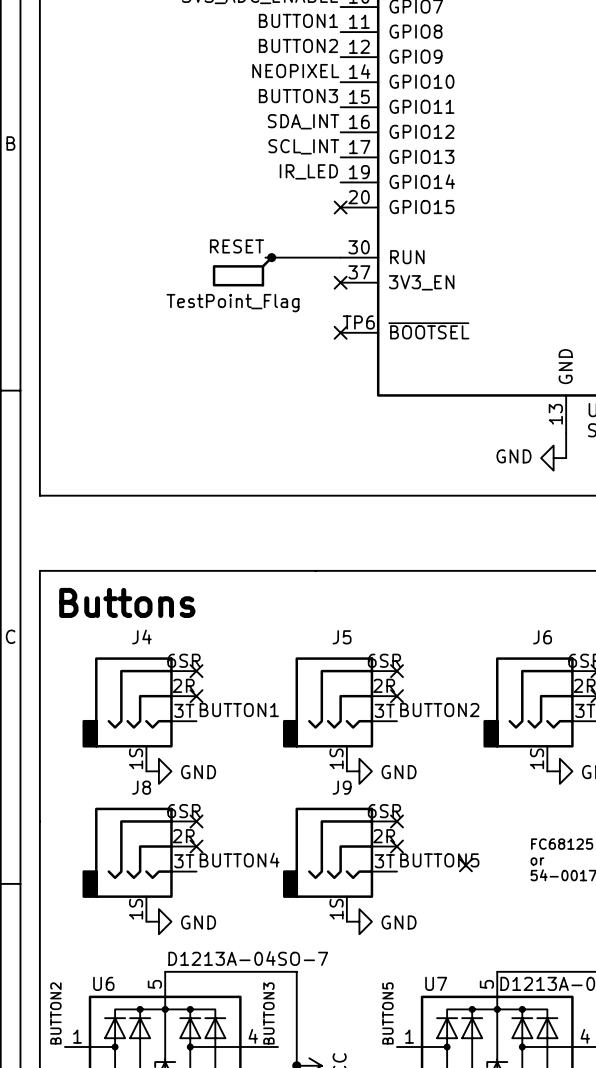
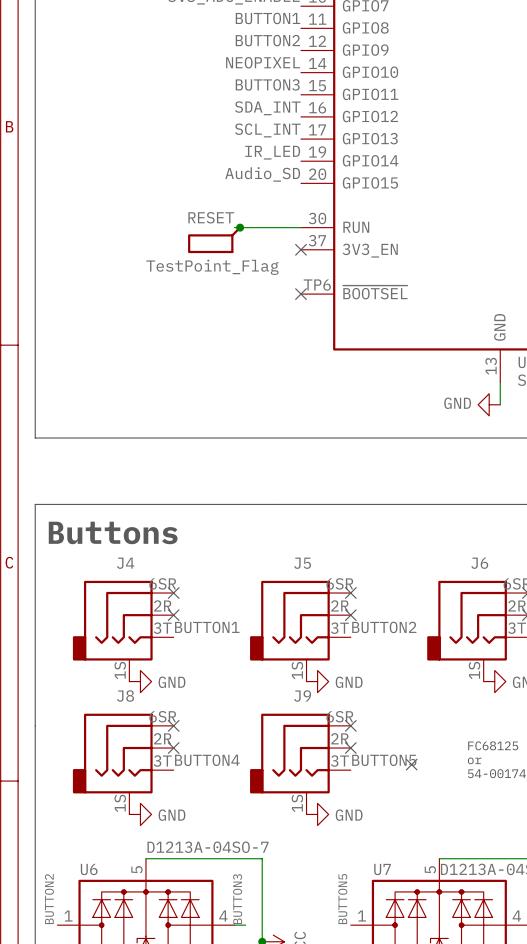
label: none -> Audio_SD (262, 174)
no-connect mark: (340, 207) -> none

